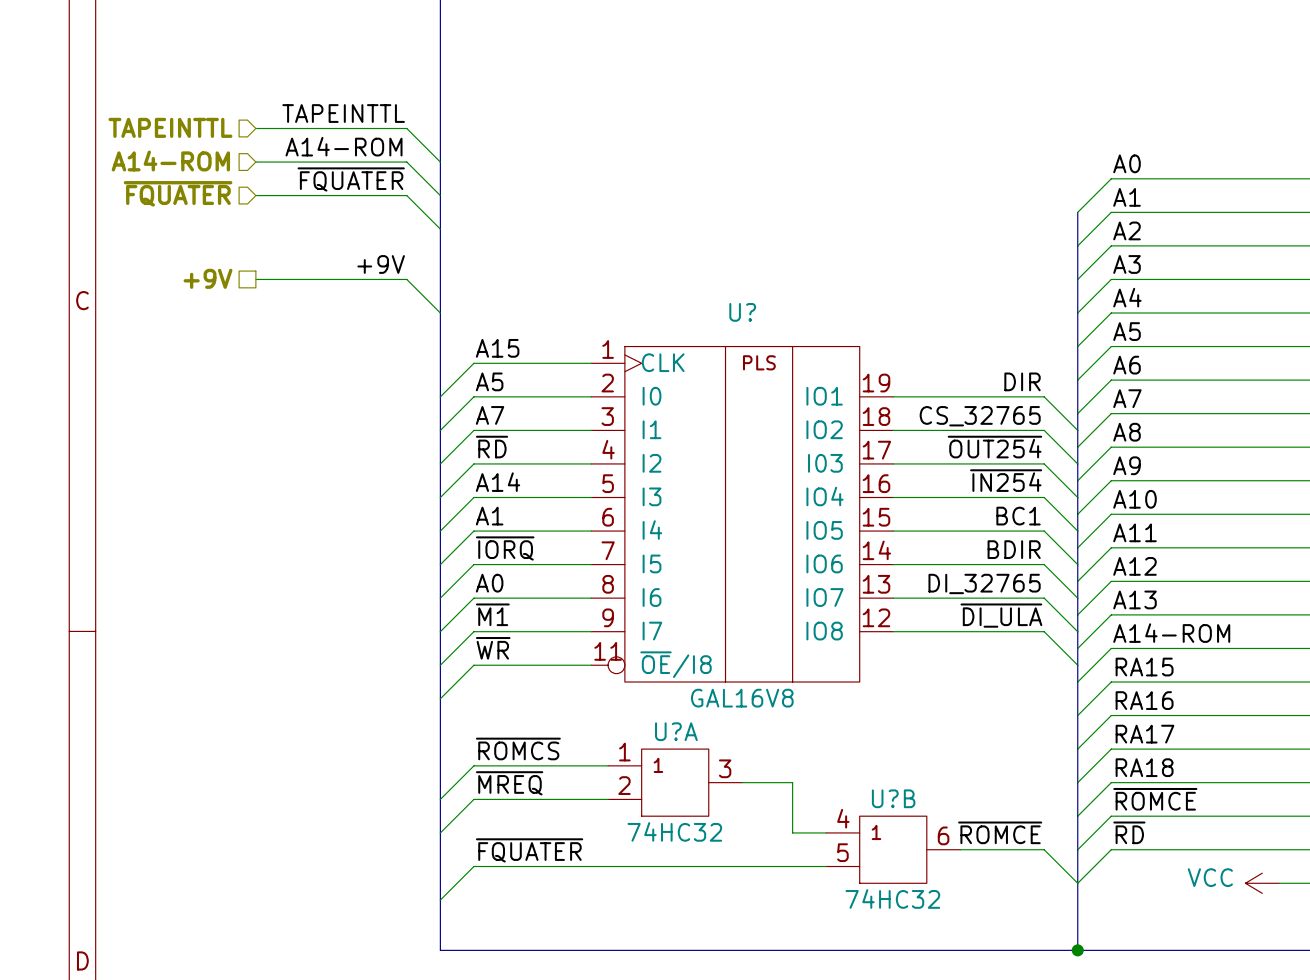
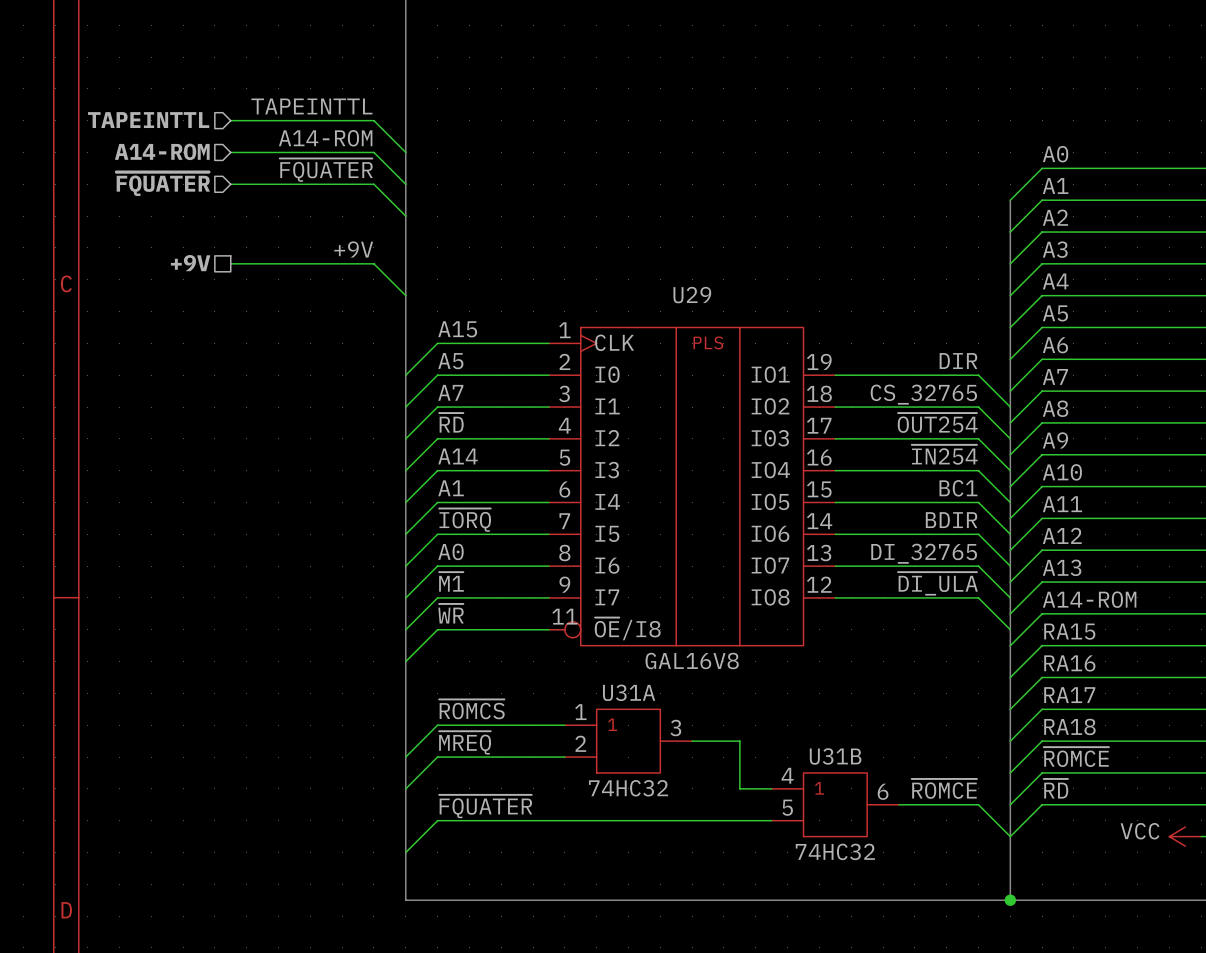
U? name: U? (742, 312) -> U29 (692, 295)
U?A name: U?A (676, 731) -> U31A (629, 692)
U?B name: U?B (893, 798) -> U31B (835, 756)

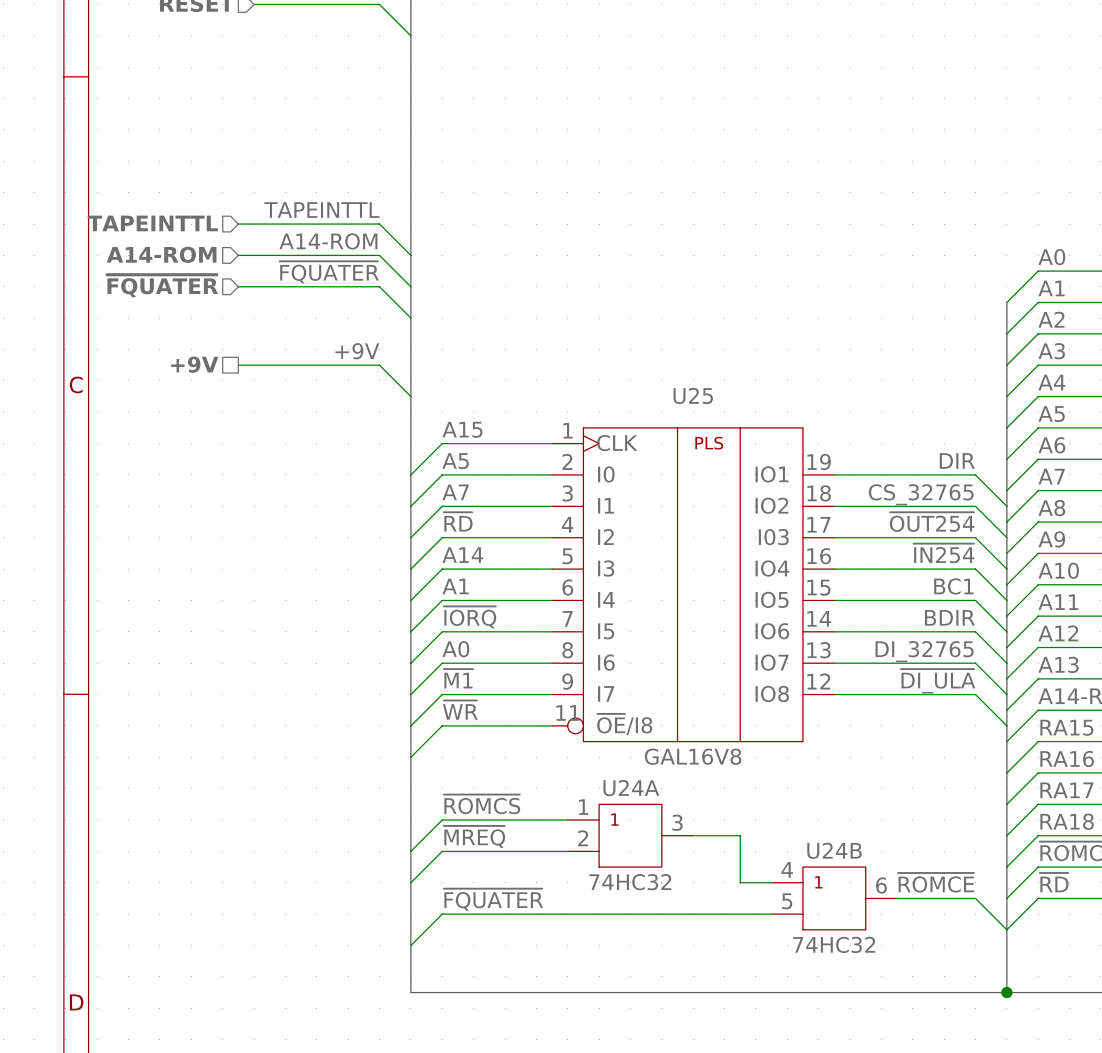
U29 name: U29 (692, 295) -> U25 (693, 395)
U31A name: U31A (629, 692) -> U24A (631, 788)
U31B name: U31B (835, 756) -> U24B (834, 850)

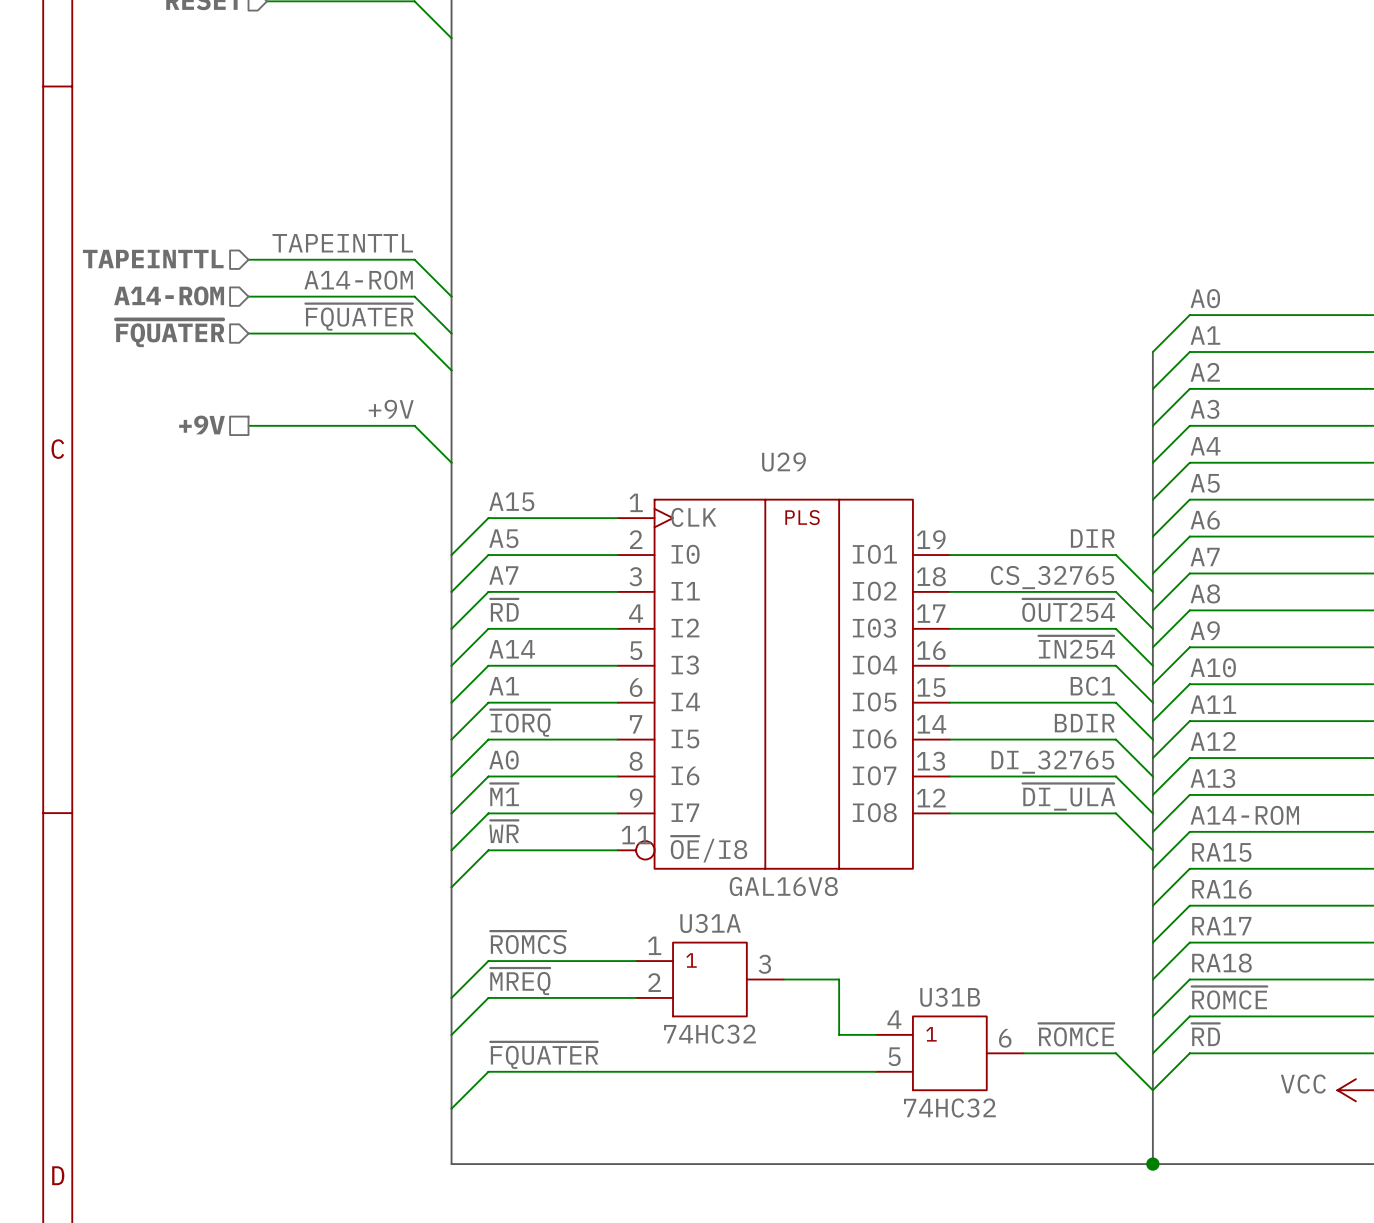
U25 name: U25 (693, 395) -> U29 (783, 462)
U24A name: U24A (631, 788) -> U31A (710, 923)
U24B name: U24B (834, 850) -> U31B (950, 997)

